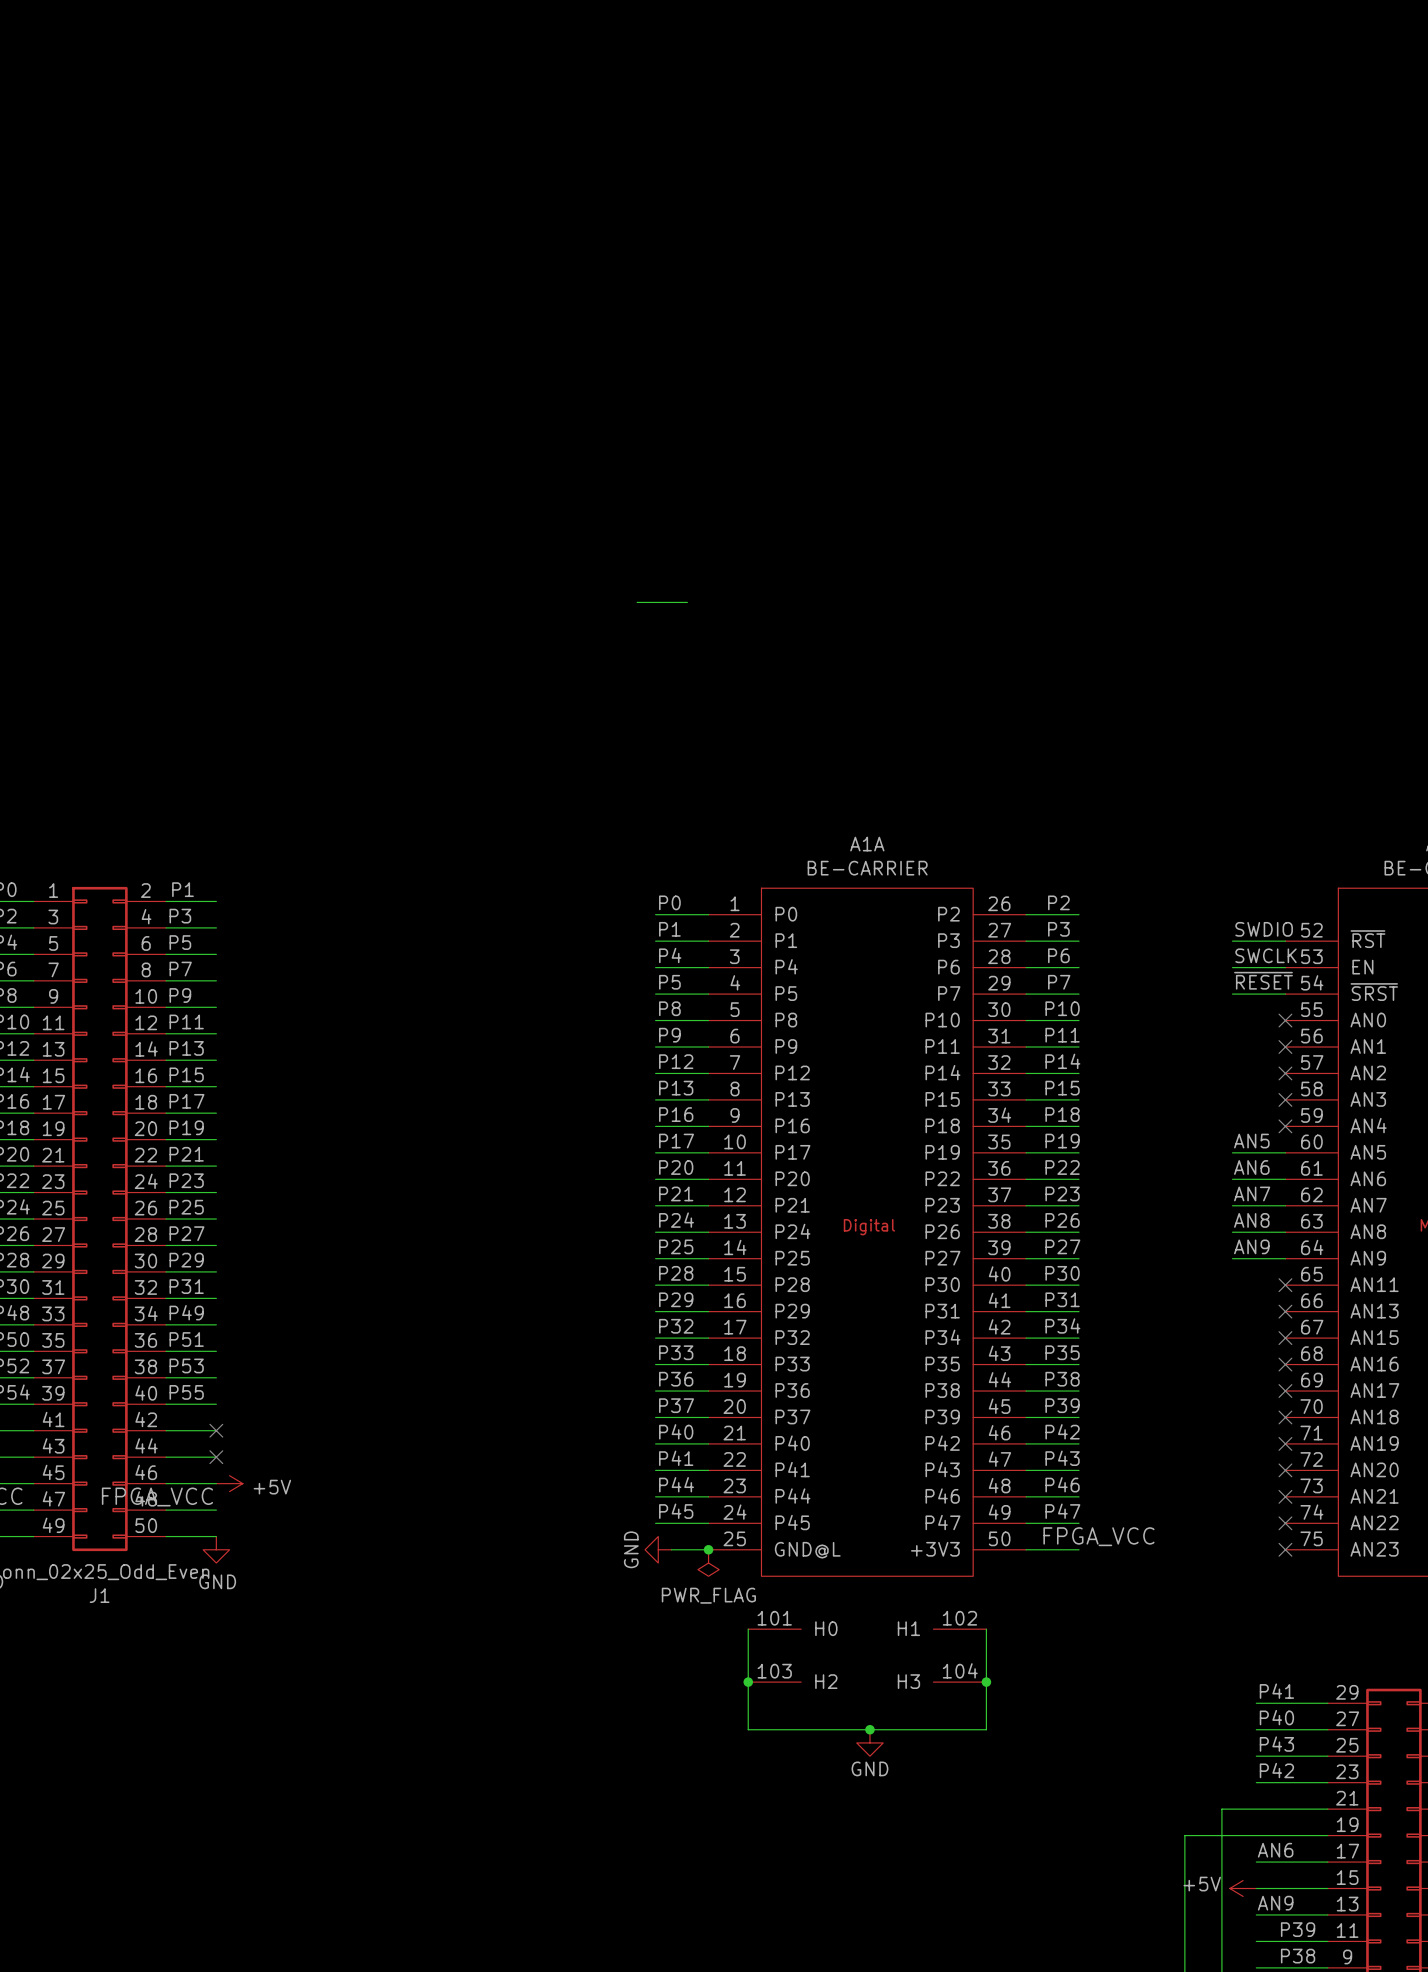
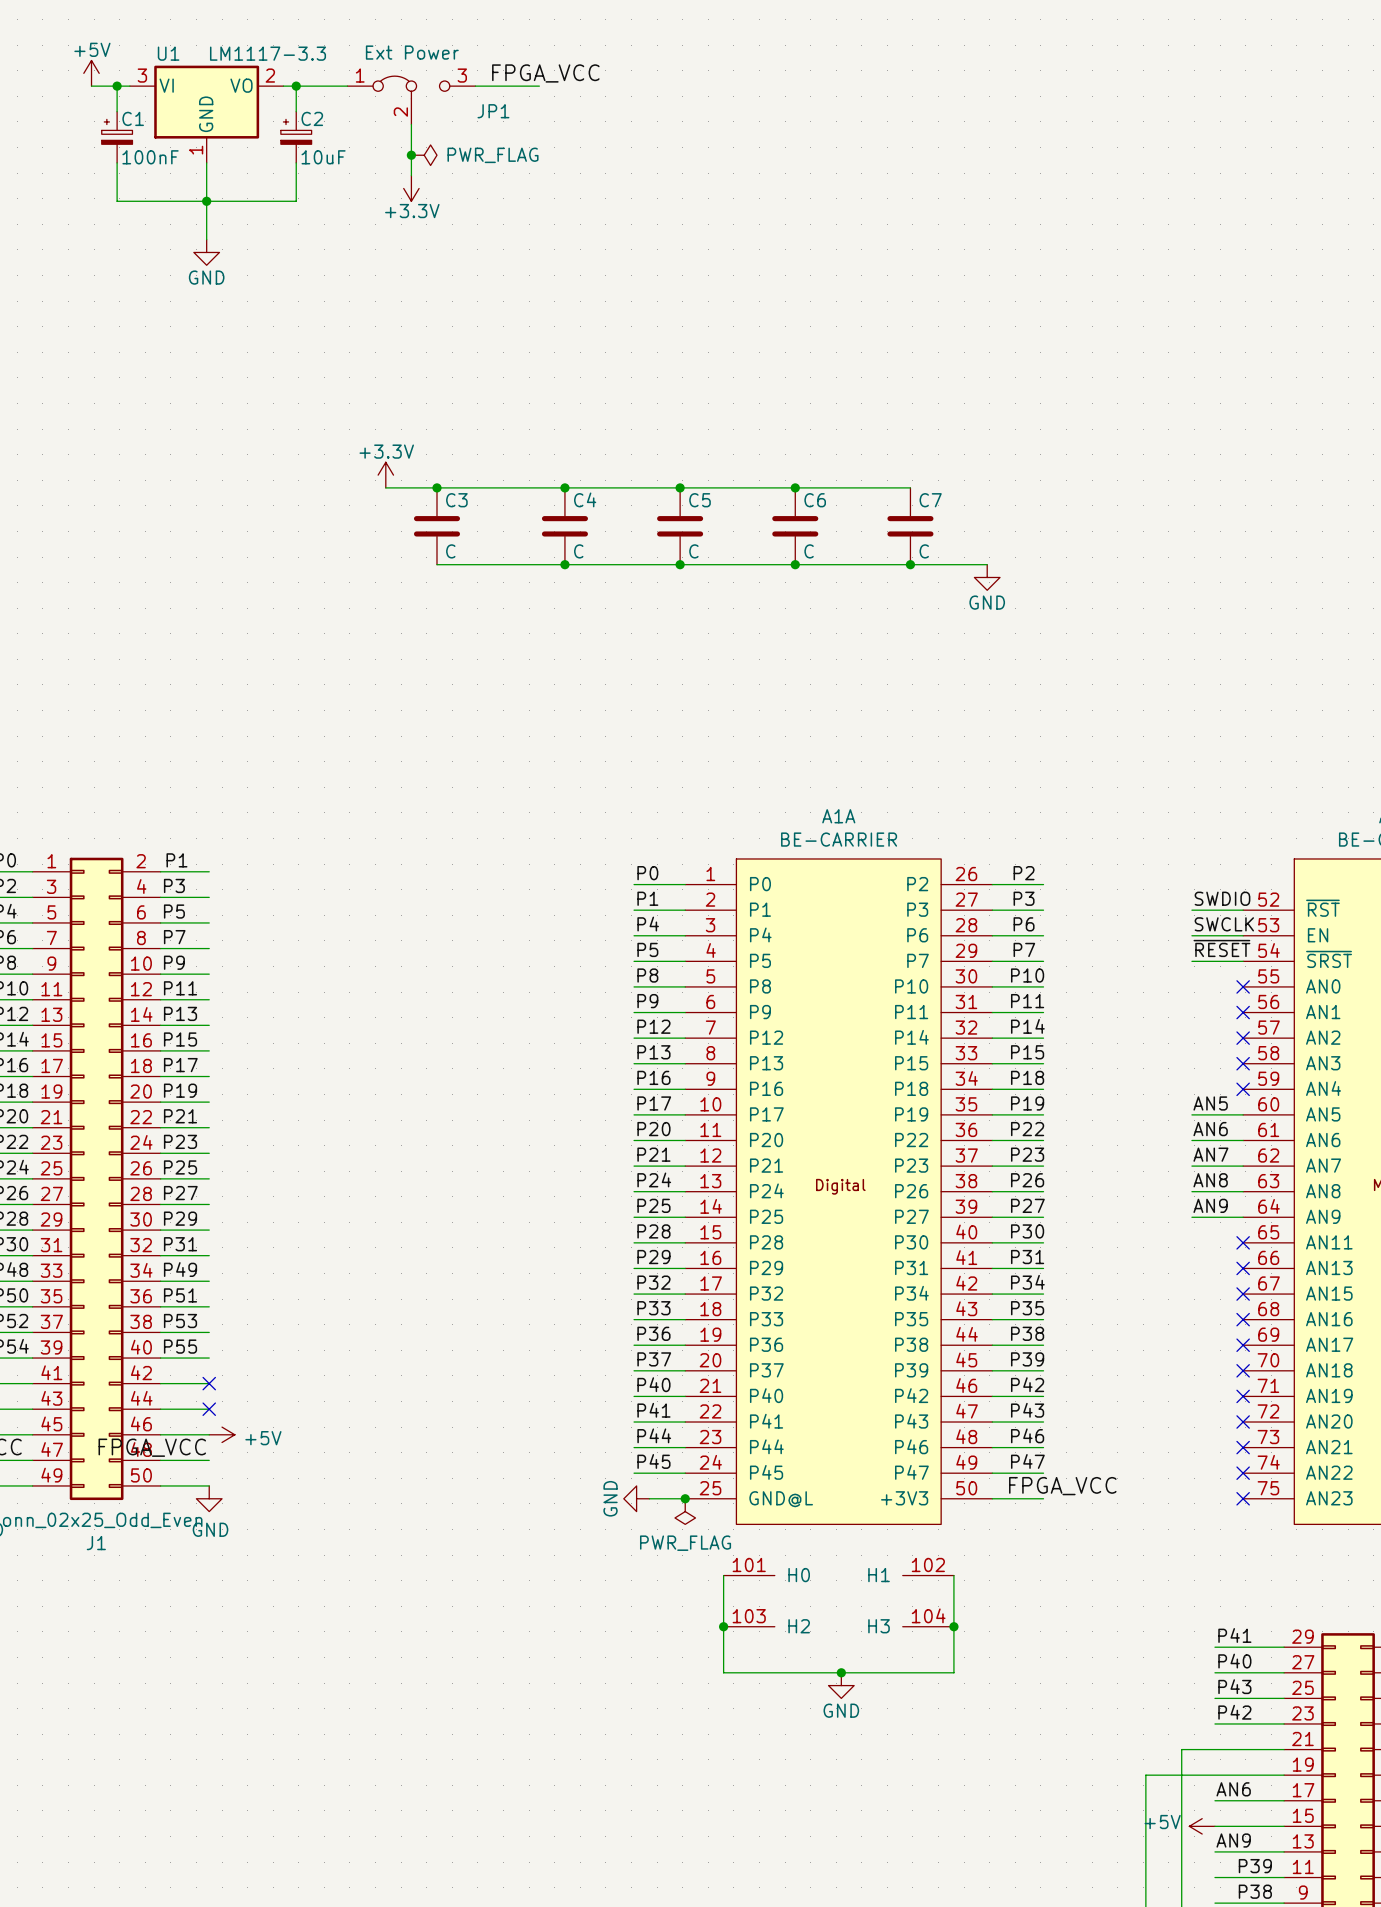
power symbol: none -> +5V (91, 73)
label: none -> FPGA_VCC (545, 73)
wire: none -> (91, 86) (129, 86)
wire: none -> (117, 86) (117, 111)
junction: none -> (117, 86)
wire: none -> (283, 86) (347, 86)
wire: none -> (296, 86) (296, 111)
junction: none -> (296, 86)
wire: none -> (475, 86) (539, 86)
JP1: none -> Ext Power (411, 100)
U1: none -> LM1117-3.3 (206, 114)
wire: none -> (411, 124) (411, 175)
C1: none -> 100nF (117, 137)
C2: none -> 10uF (296, 137)
junction: none -> (411, 155)
power symbol: none -> PWR_FLAG (424, 155)
wire: none -> (117, 162) (117, 201) (296, 201) (296, 162)
wire: none -> (206, 162) (206, 239)
power symbol: none -> +3.3V (411, 188)
junction: none -> (206, 201)
power symbol: none -> GND (206, 252)
power symbol: none -> +3.3V (385, 475)
wire: none -> (385, 487) (910, 487)
junction: none -> (436, 487)
junction: none -> (564, 487)
junction: none -> (680, 487)
junction: none -> (795, 487)
C3: none -> C (436, 526)
C4: none -> C (564, 526)
C5: none -> C (680, 526)
C6: none -> C (795, 526)
C7: none -> C (910, 526)
wire: none -> (436, 564) (987, 564)
junction: none -> (564, 564)
junction: none -> (680, 564)
junction: none -> (795, 564)
junction: none -> (910, 564)
power symbol: none -> GND (987, 577)
wire: (637, 602) (687, 602) -> none

